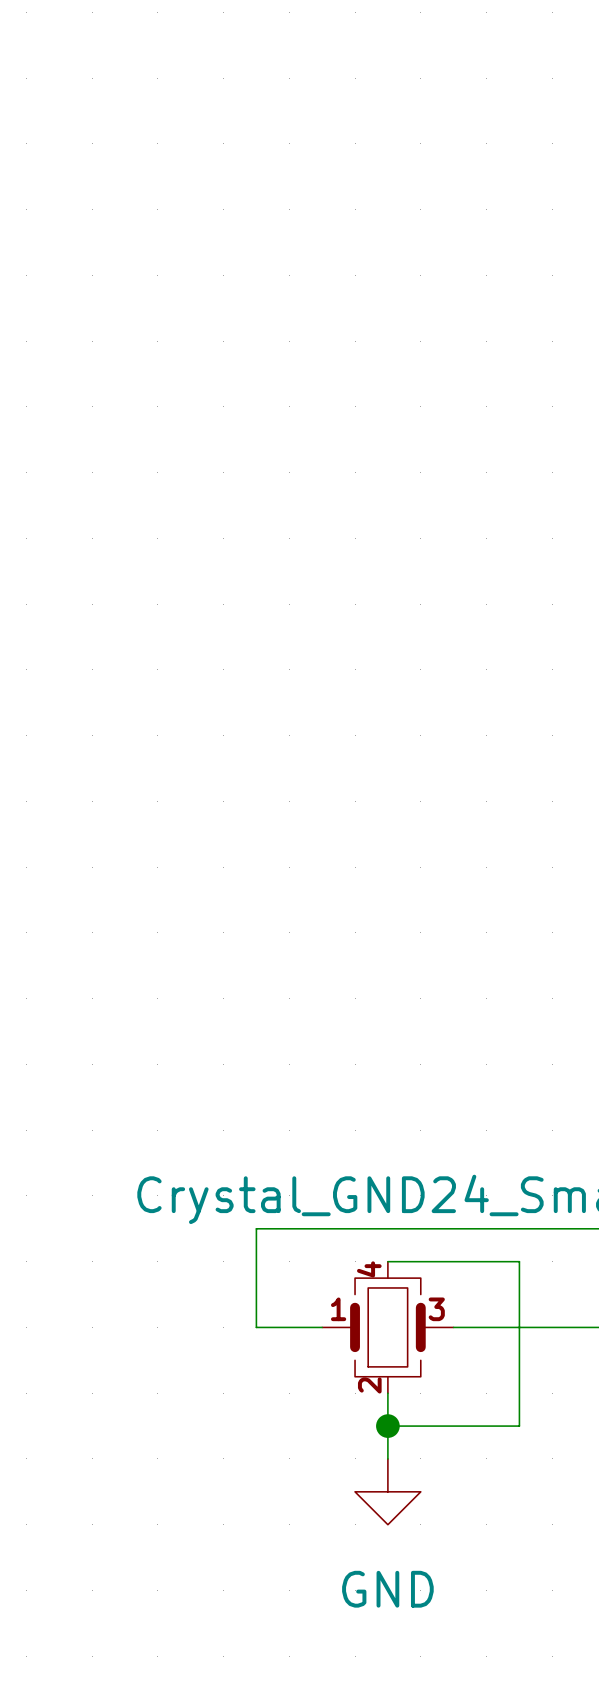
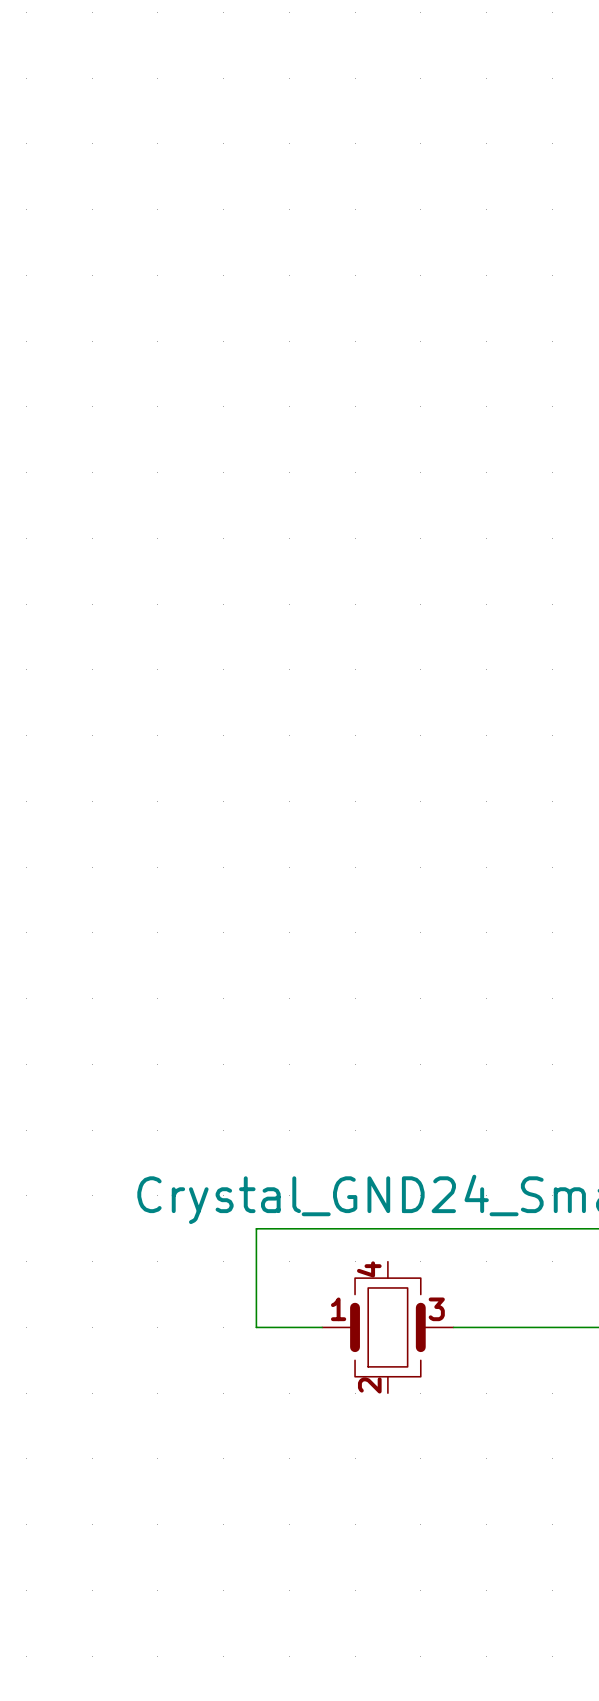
wire: (387, 1261) (519, 1261) (519, 1426) (387, 1426) -> none
wire: (387, 1393) (387, 1458) -> none
junction: (387, 1426) -> none
power symbol: GND (387, 1491) -> none

